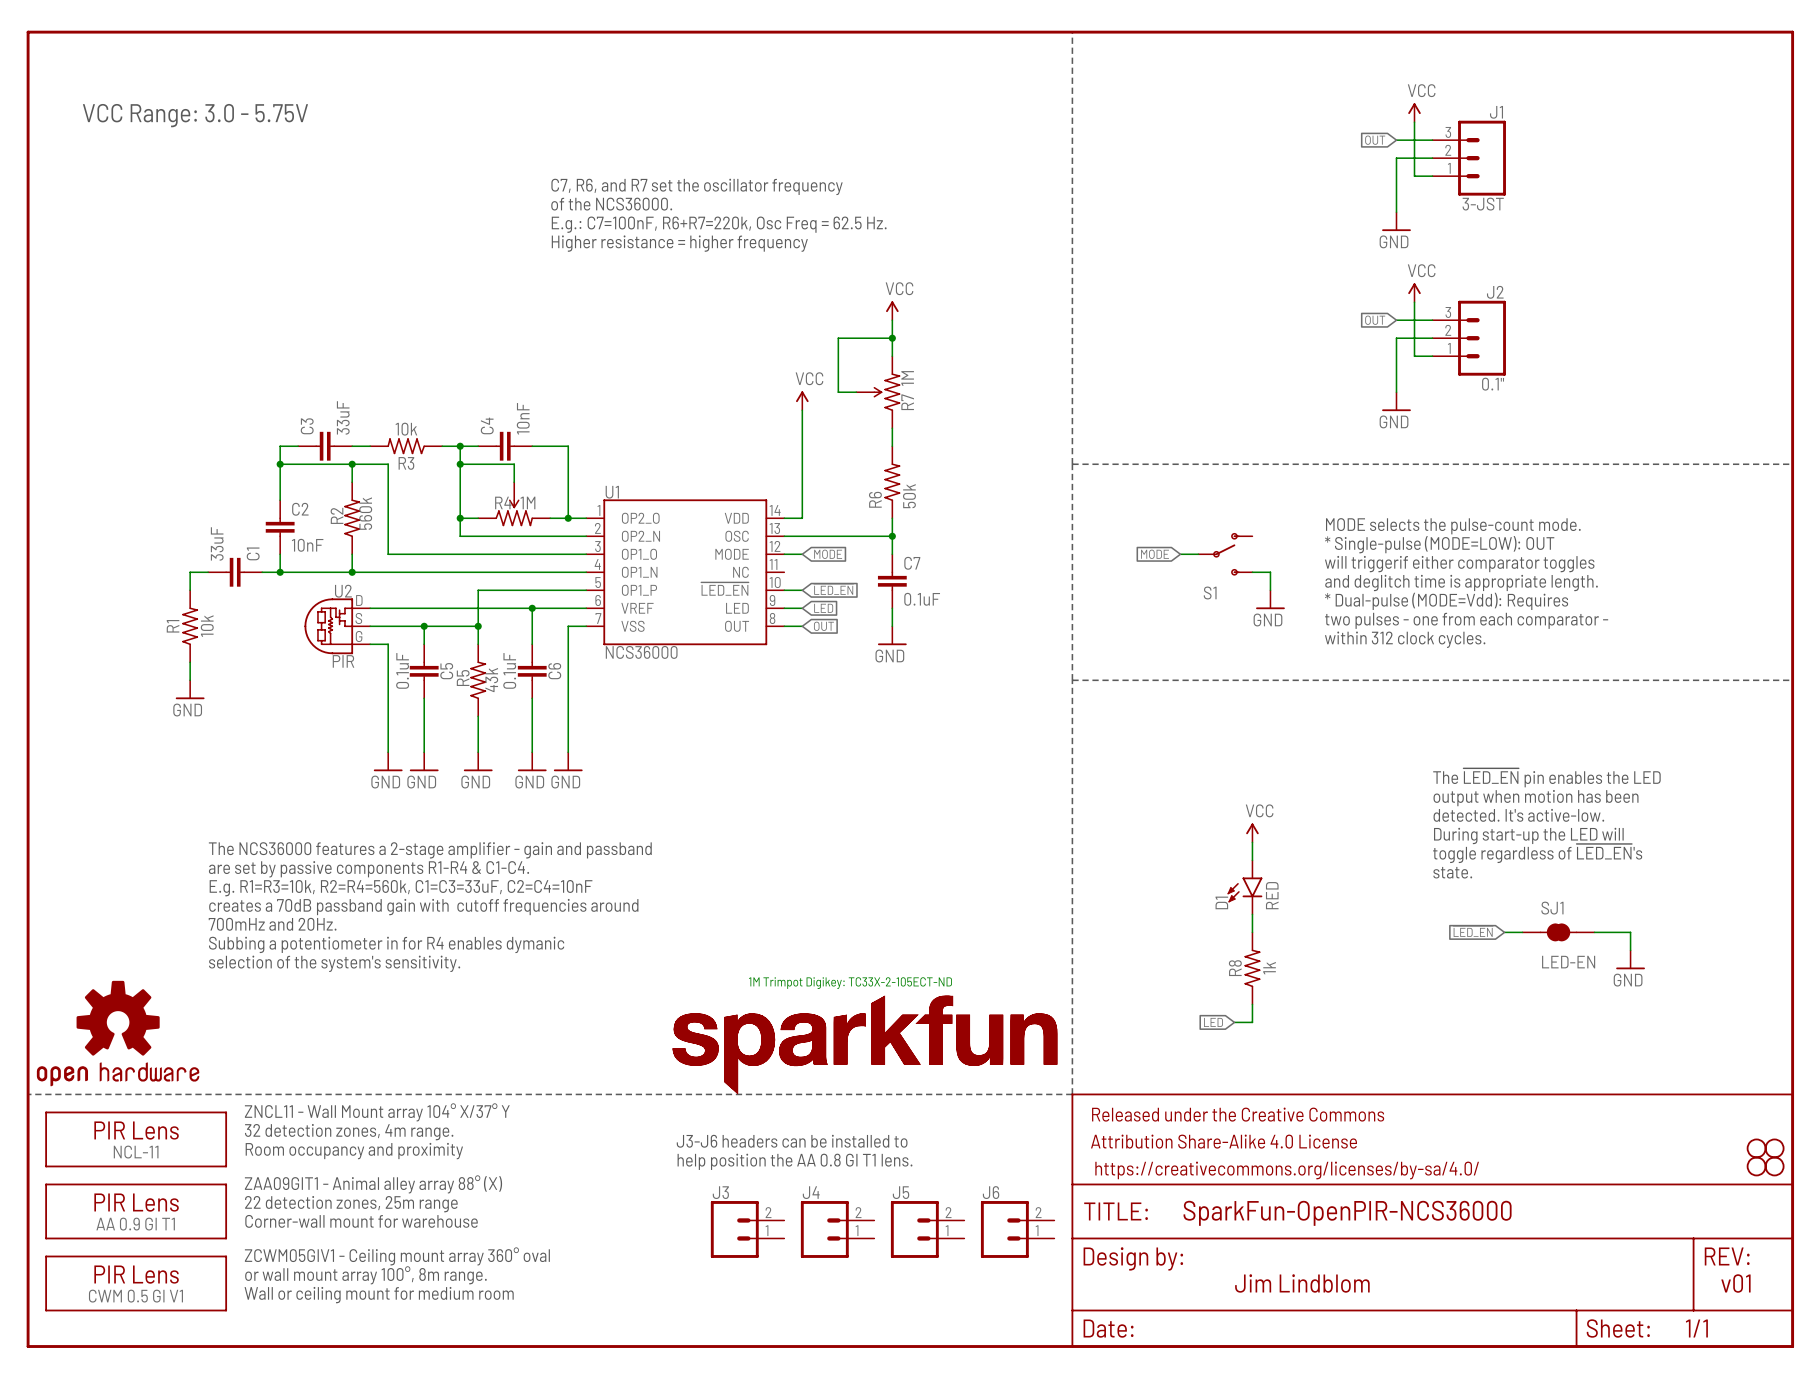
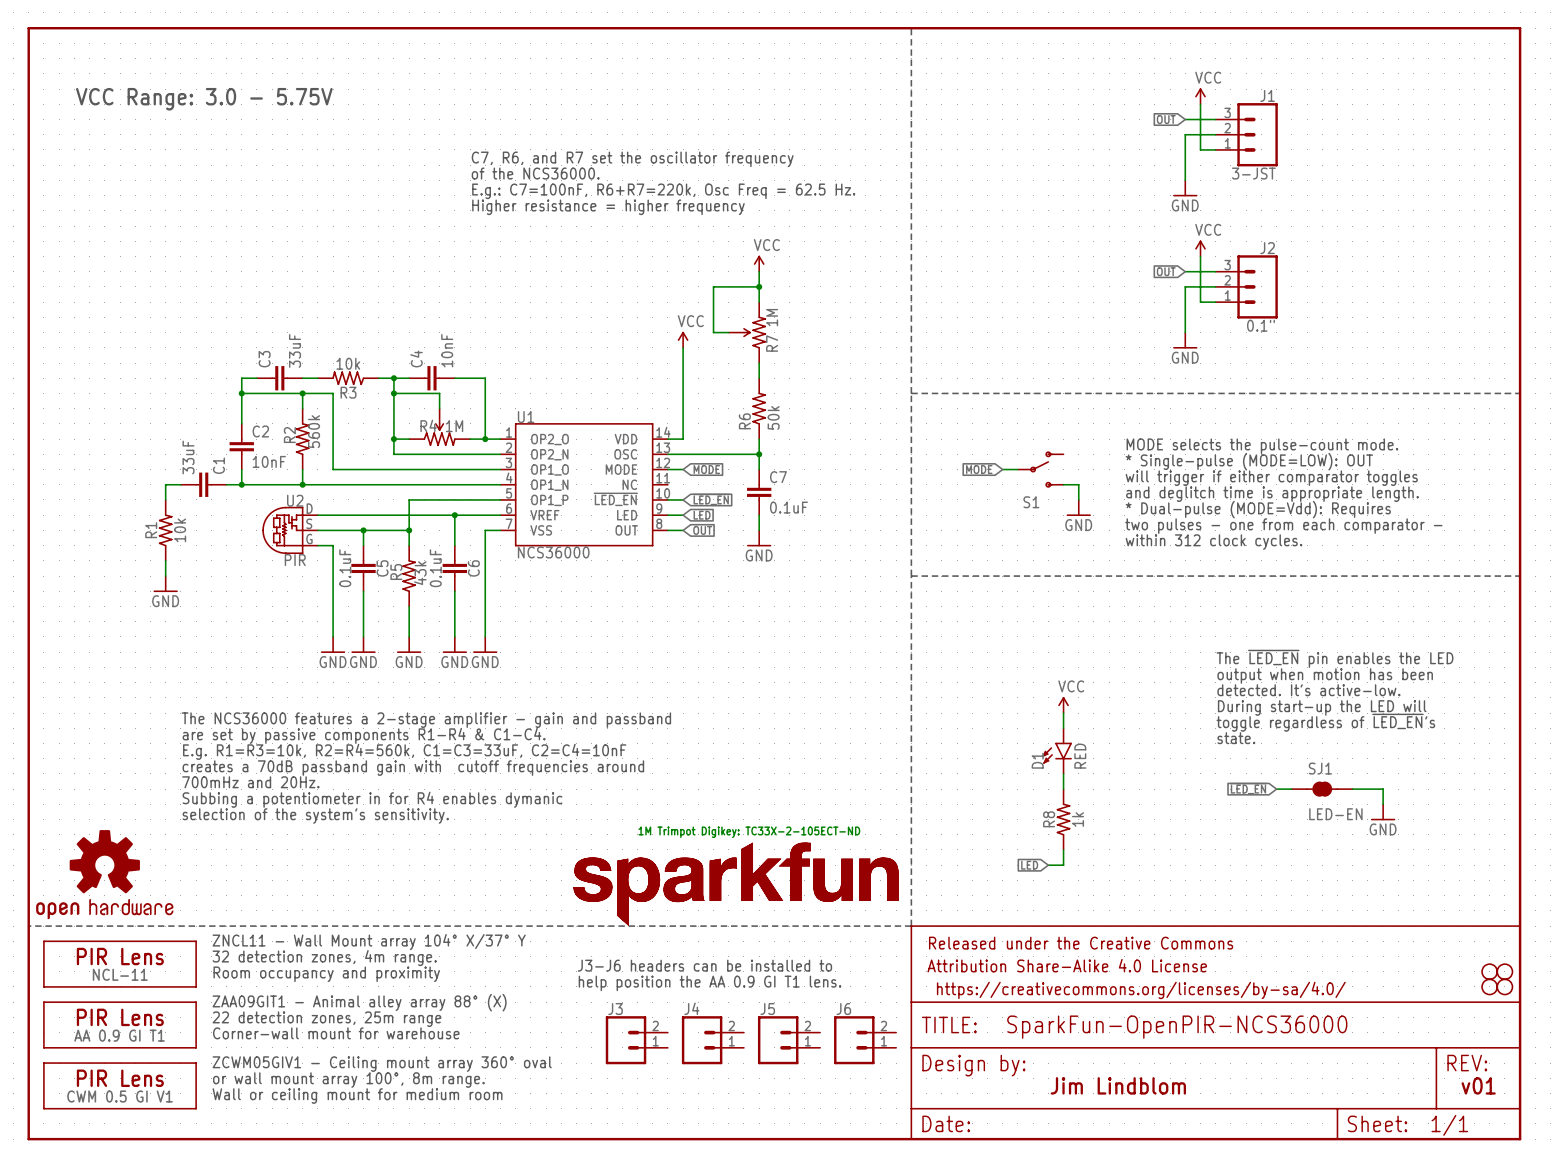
text: will triggerif either comparator toggles (1459, 564) -> will trigger if either comparator toggles (1271, 478)
text: help position the AA 0.8 GI T1 lens. (794, 1161) -> help position the AA 0.9 GI T1 lens. (709, 983)

